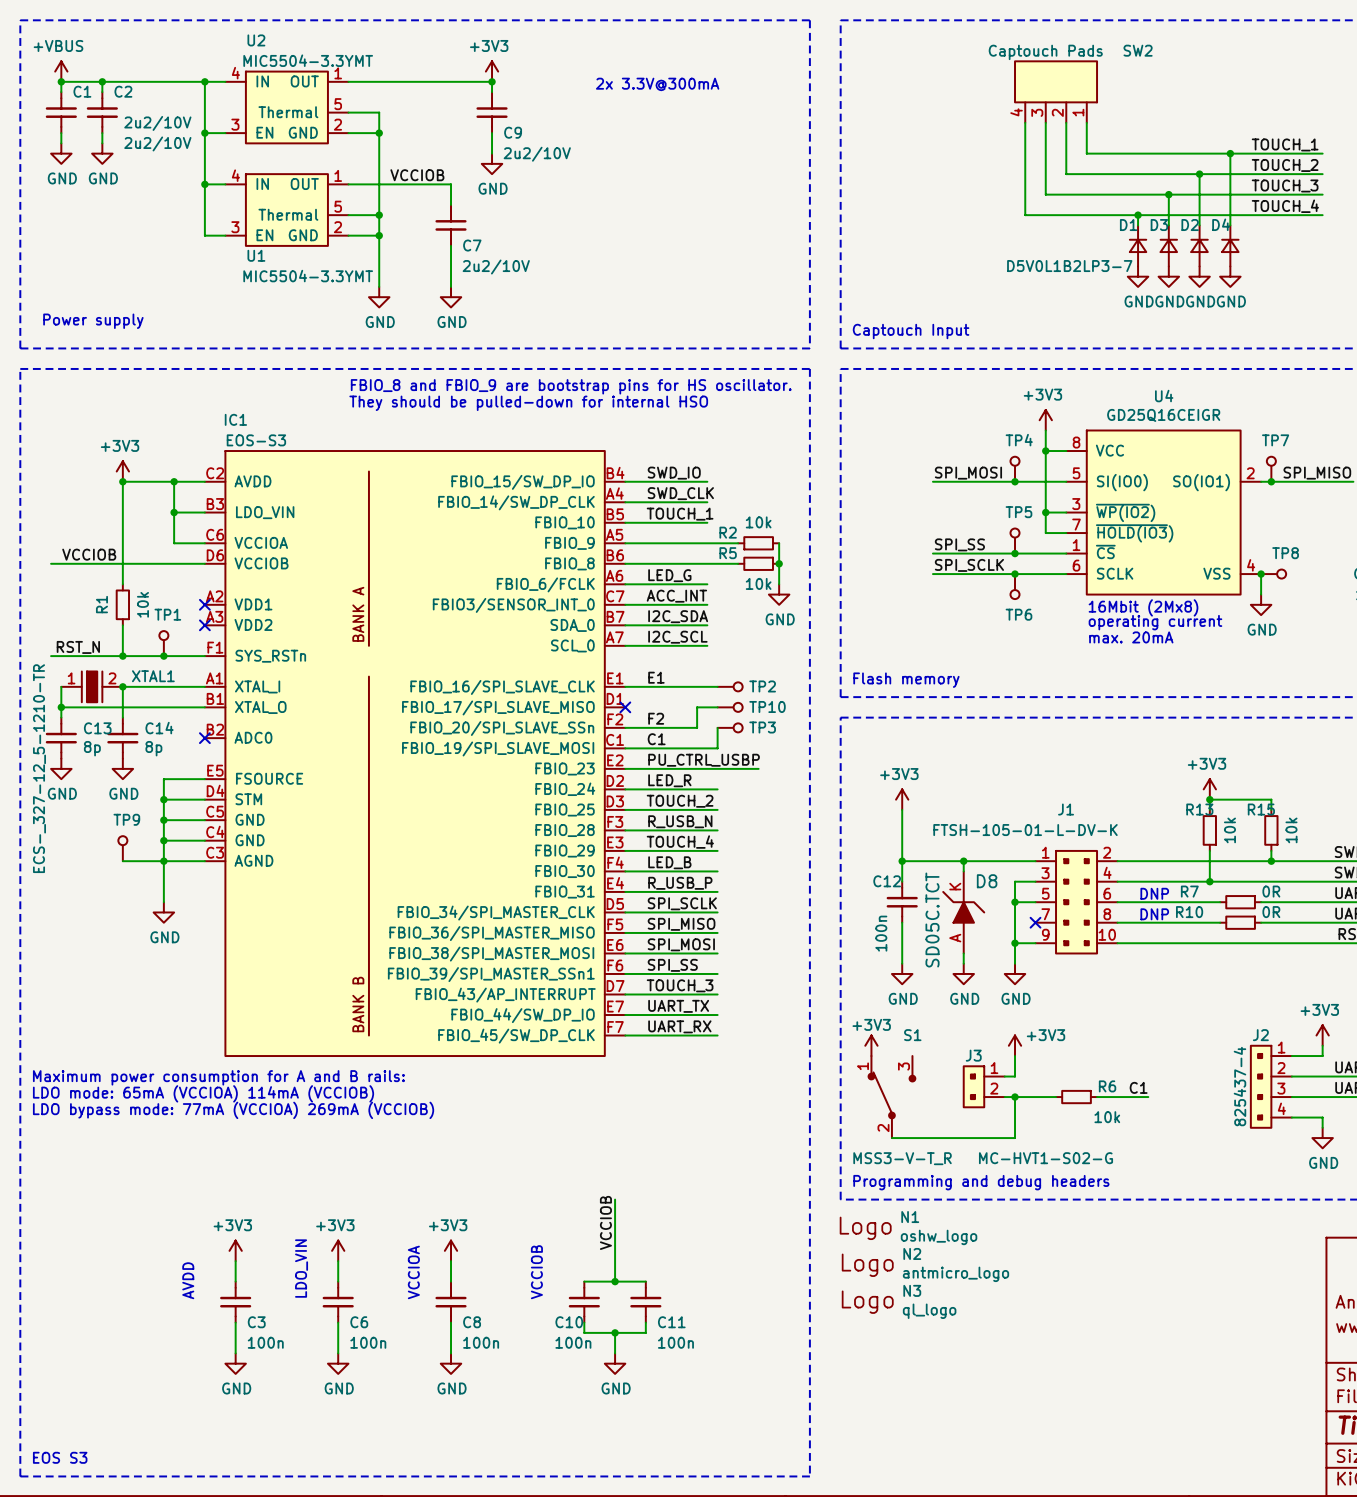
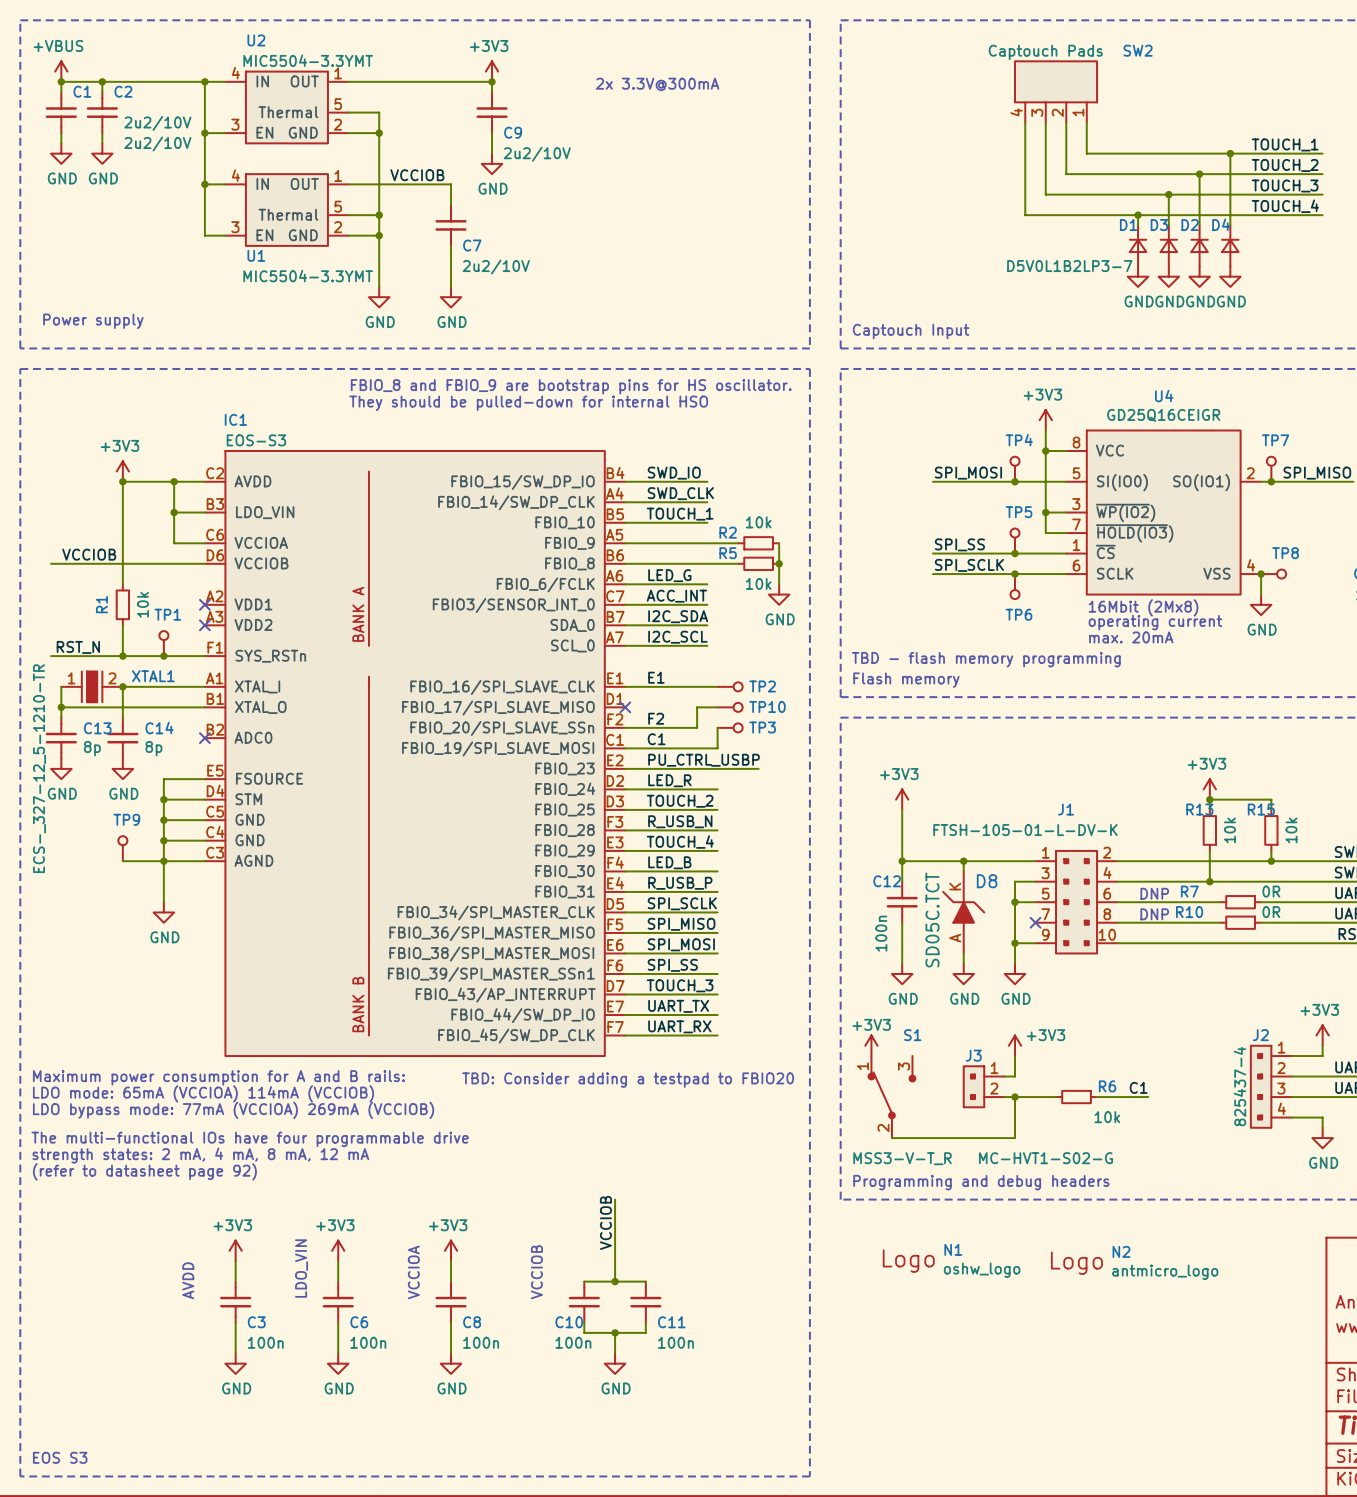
text: none -> TBD - flash memory programming (986, 659)
text: none -> TBD: Consider adding a testpad to FBIO20 (628, 1080)
text: none -> The multi-functional IOs have four programmable drive (250, 1139)
text: none -> strength states: 2 mA, 4 mA, 8 mA, 12 mA (200, 1155)
text: none -> (refer to datasheet page 92) (144, 1171)
N1 position: (908, 1228) -> (951, 1260)
N2 position: (925, 1265) -> (1134, 1262)
N3: ql_logo (899, 1301) -> none

